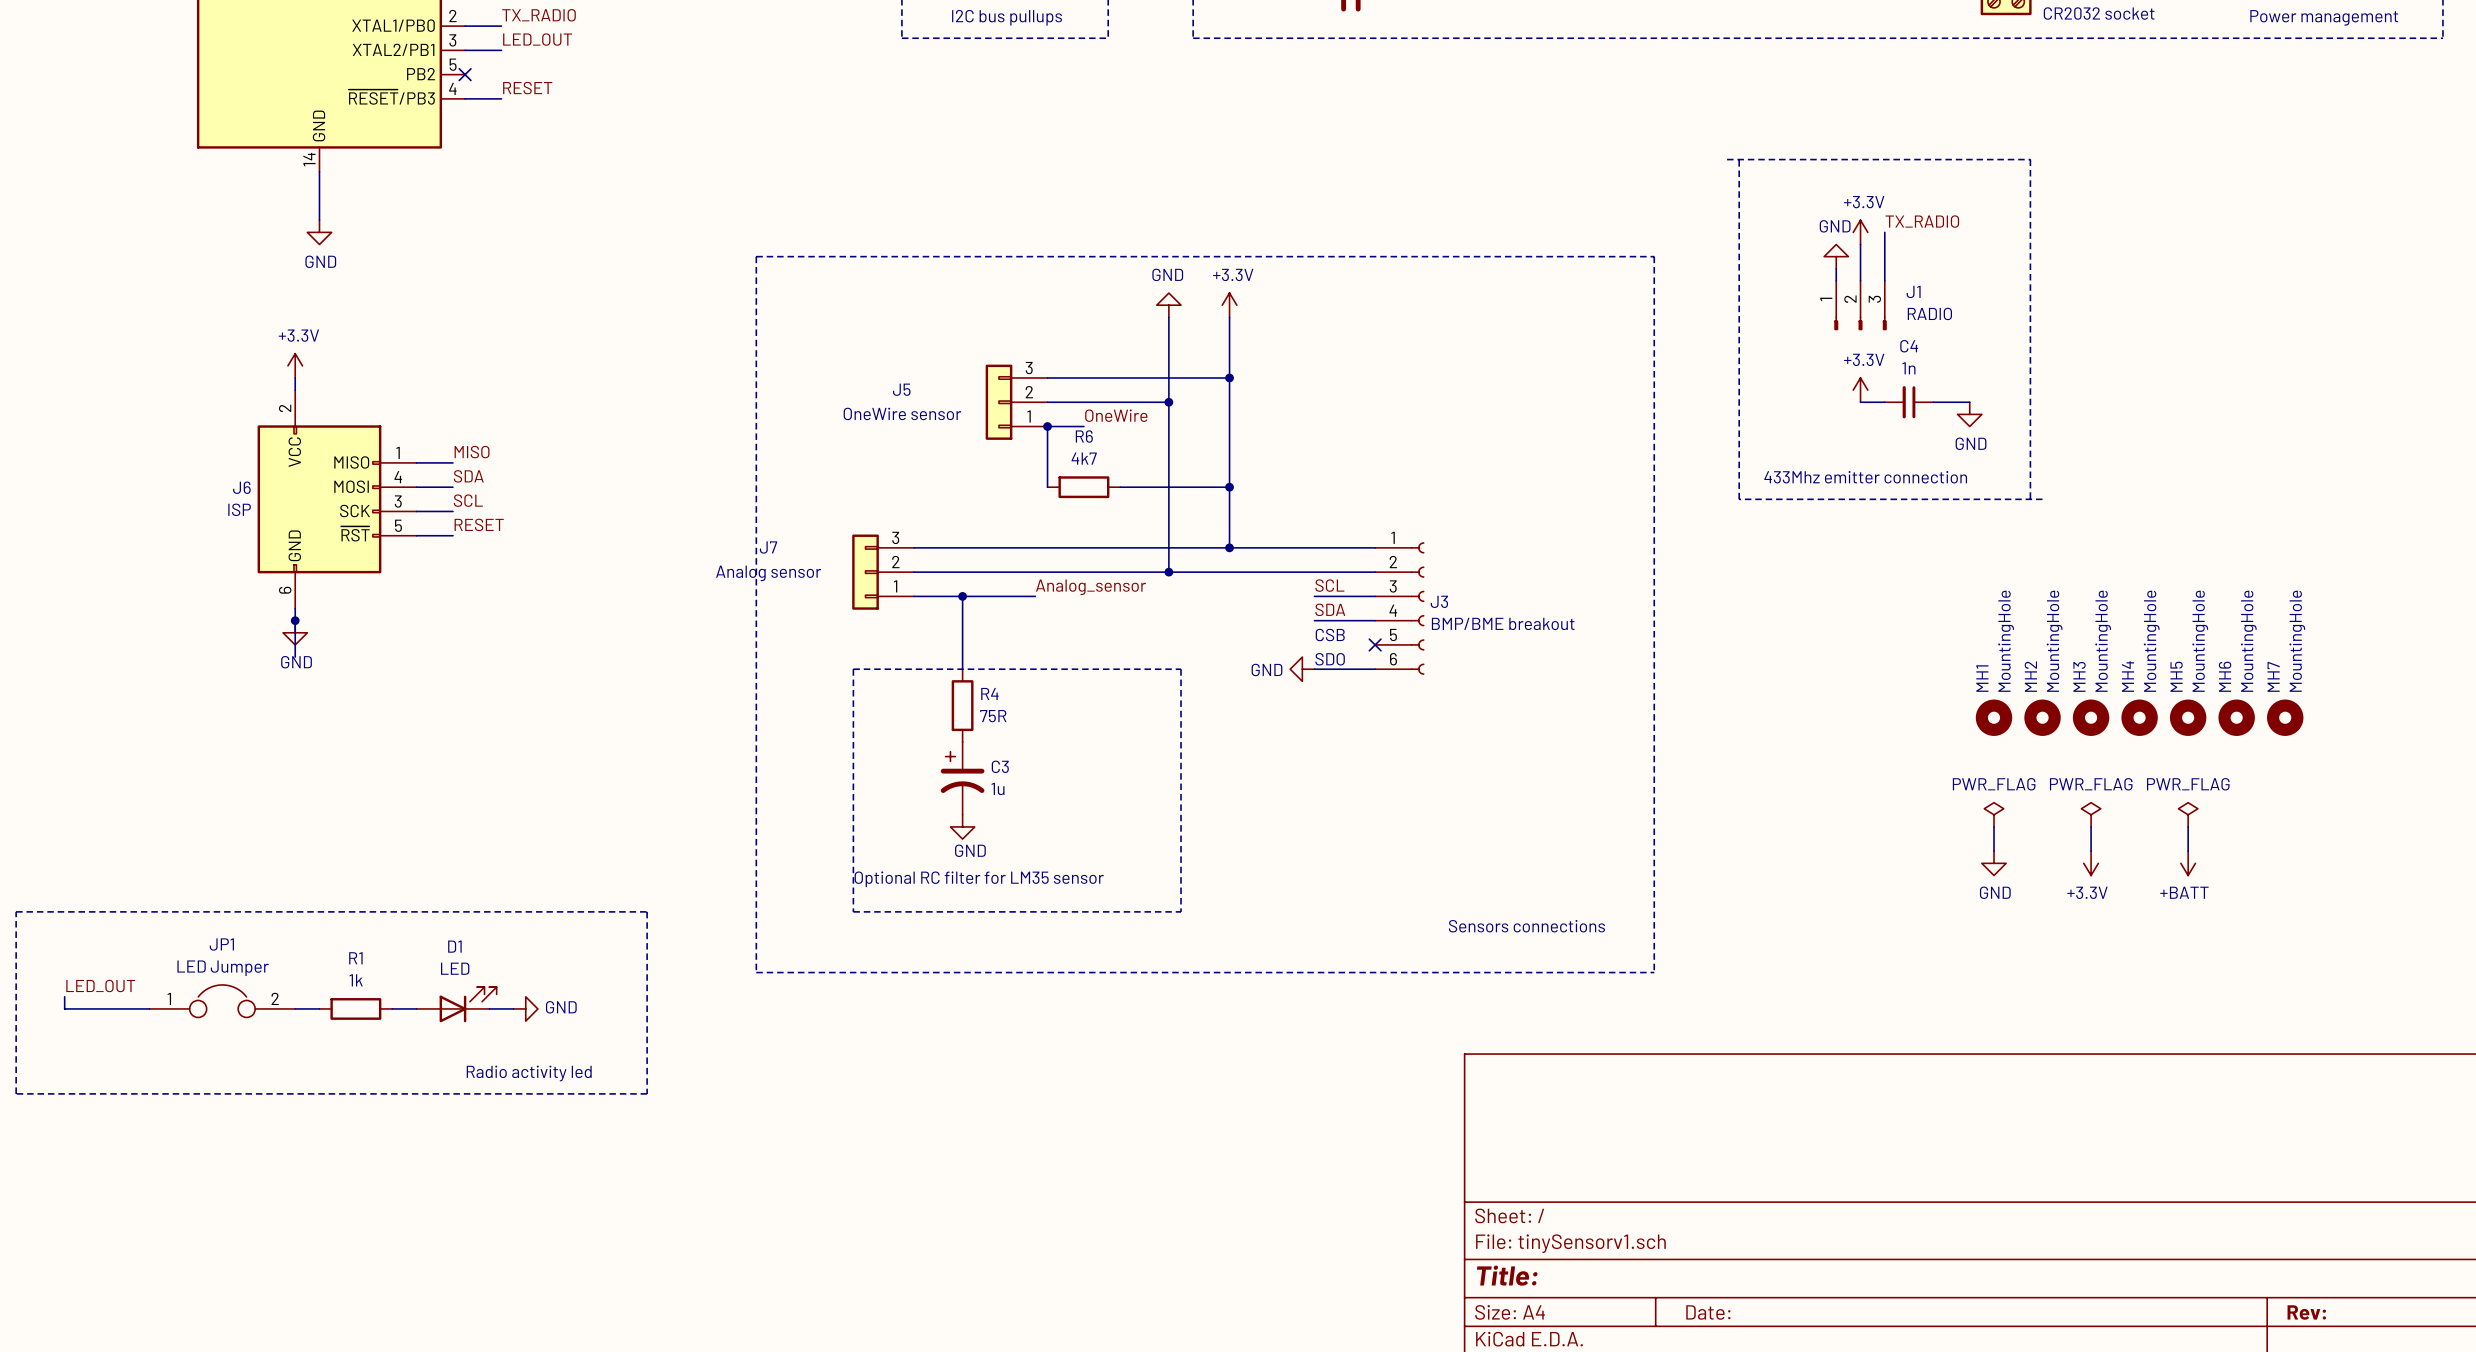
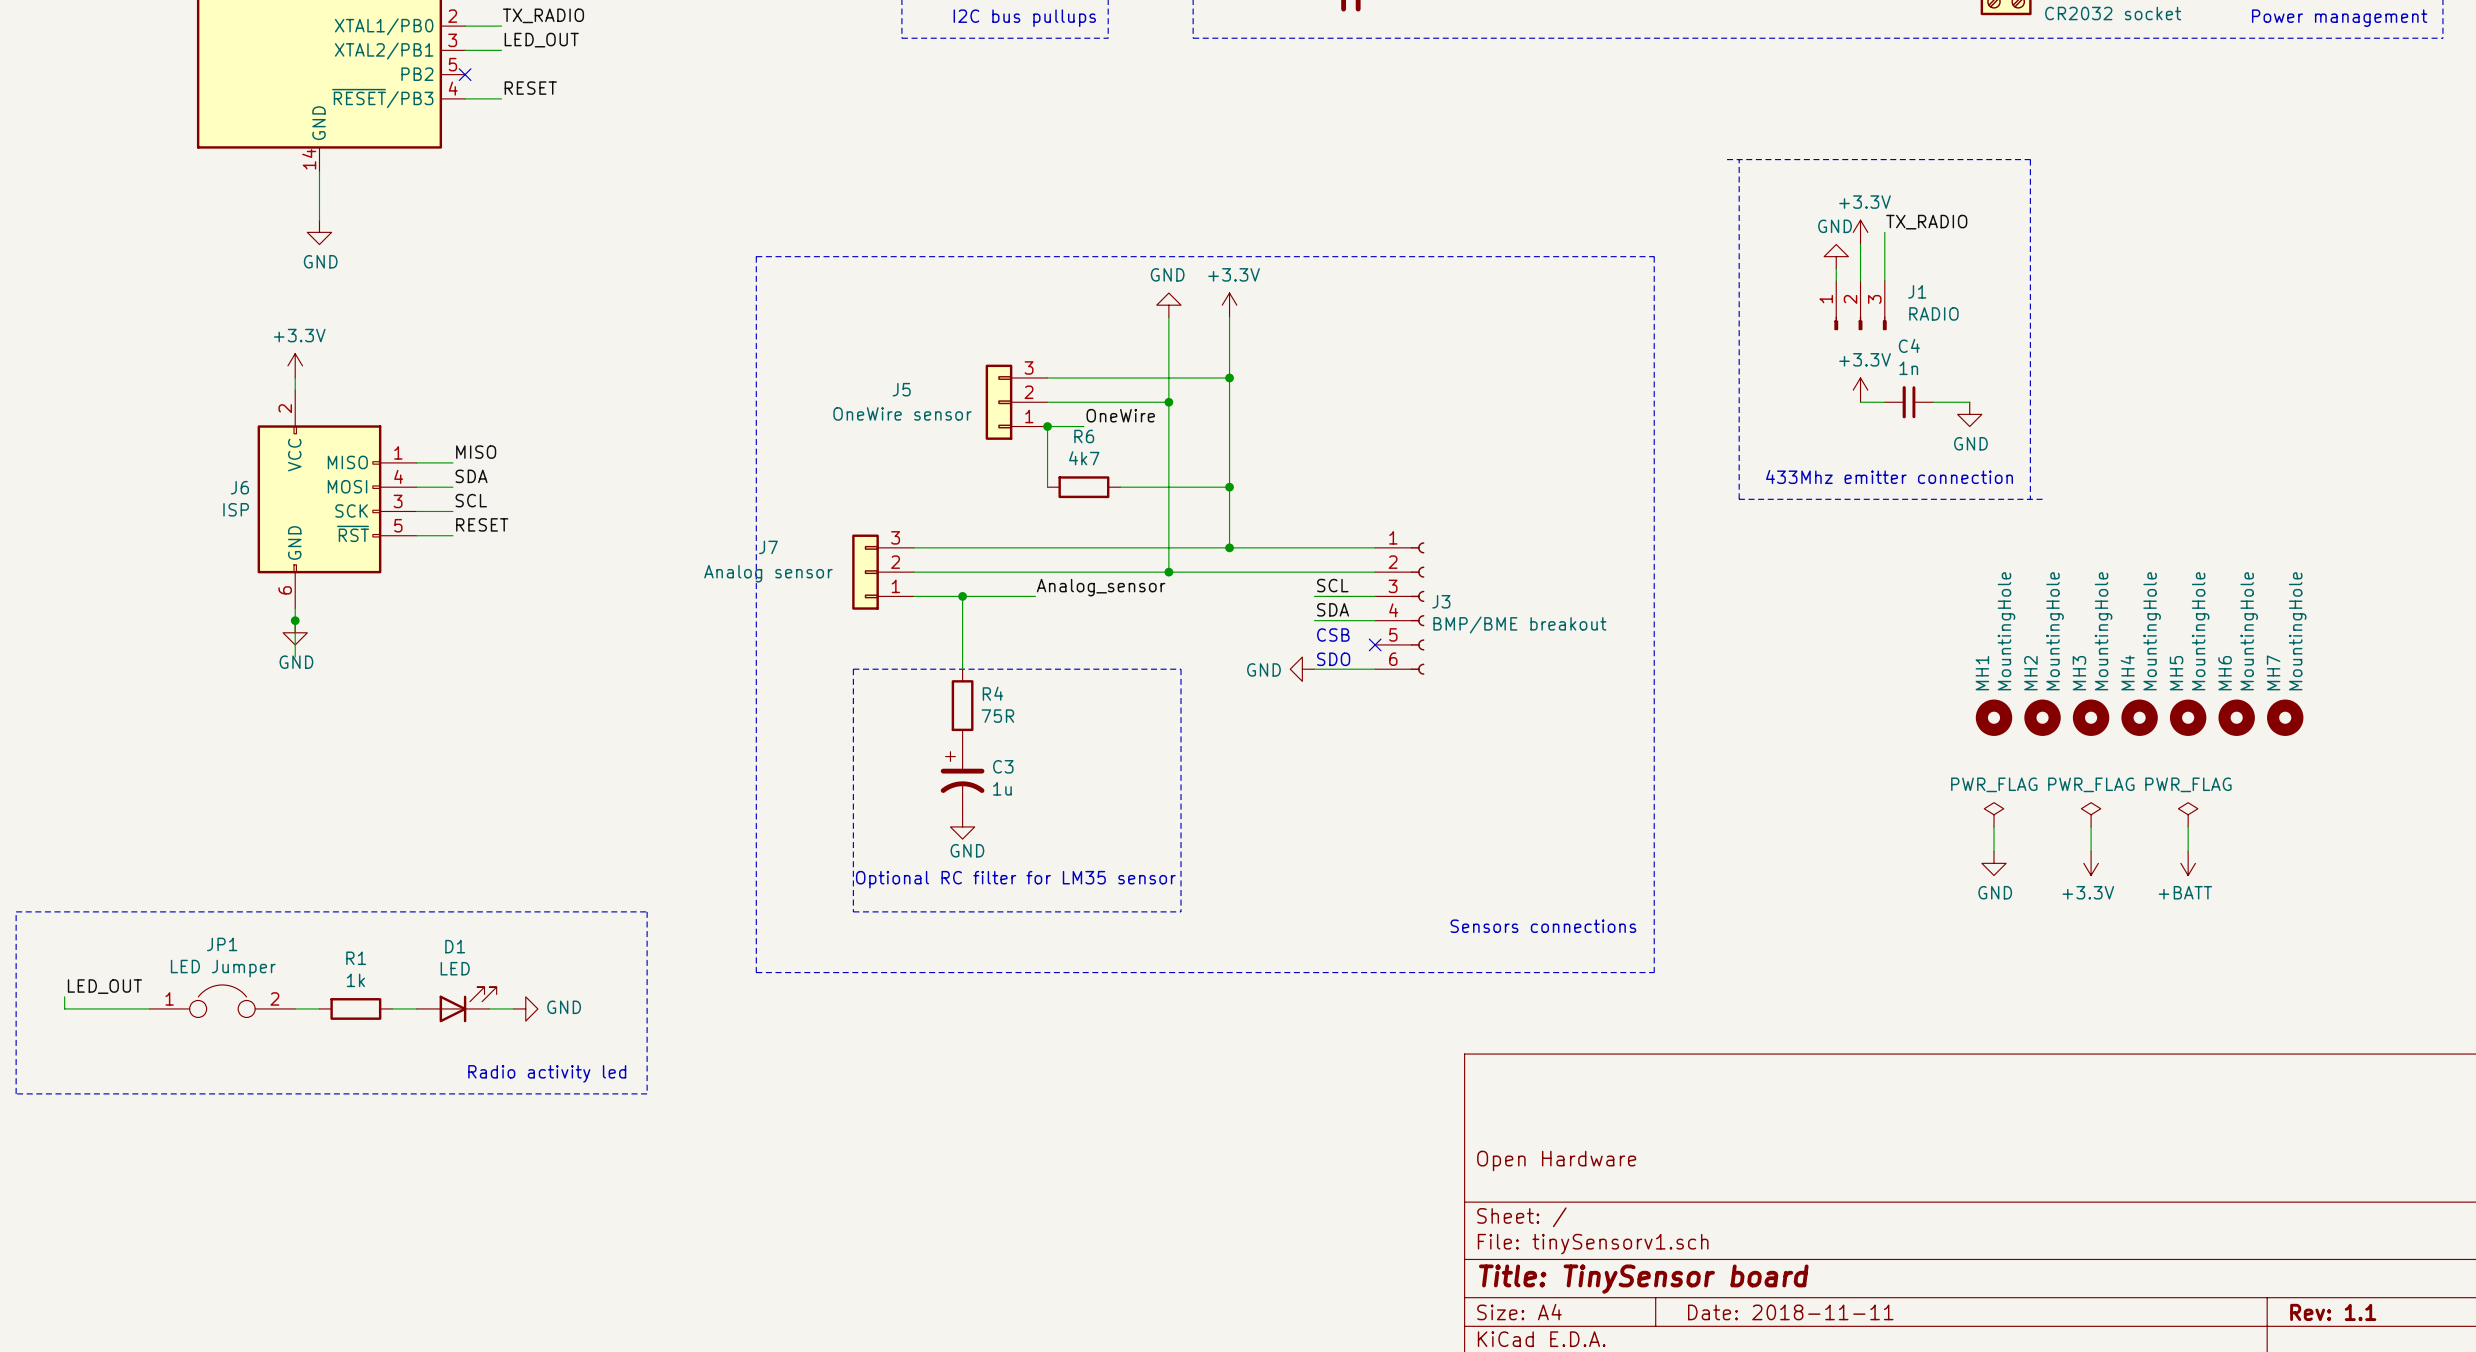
title block: none -> Open Hardware (1556, 1160)
title block: Title: (1507, 1275) -> Title: TinySensor board (1643, 1279)
title block: Date: (1708, 1312) -> Date: 2018-11-11 (1790, 1312)
title block: Rev: (2306, 1312) -> Rev: 1.1 (2333, 1312)

